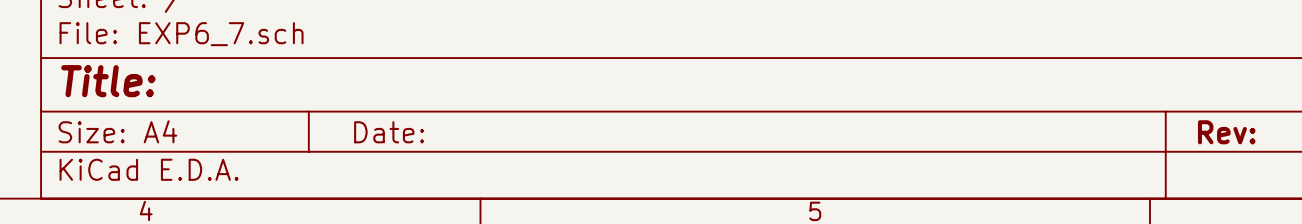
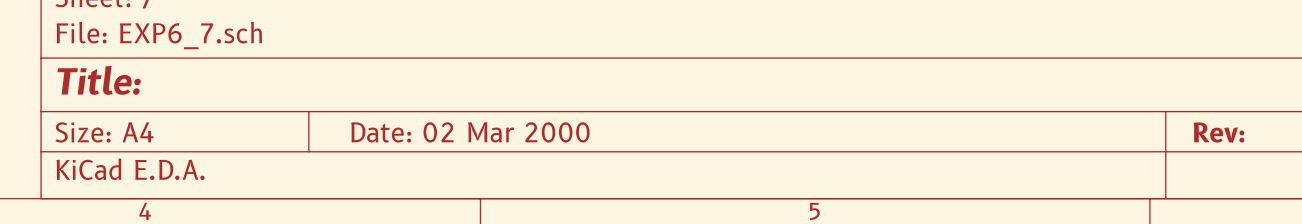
title block: Date: (389, 132) -> Date: 02 Mar 2000 (470, 132)

